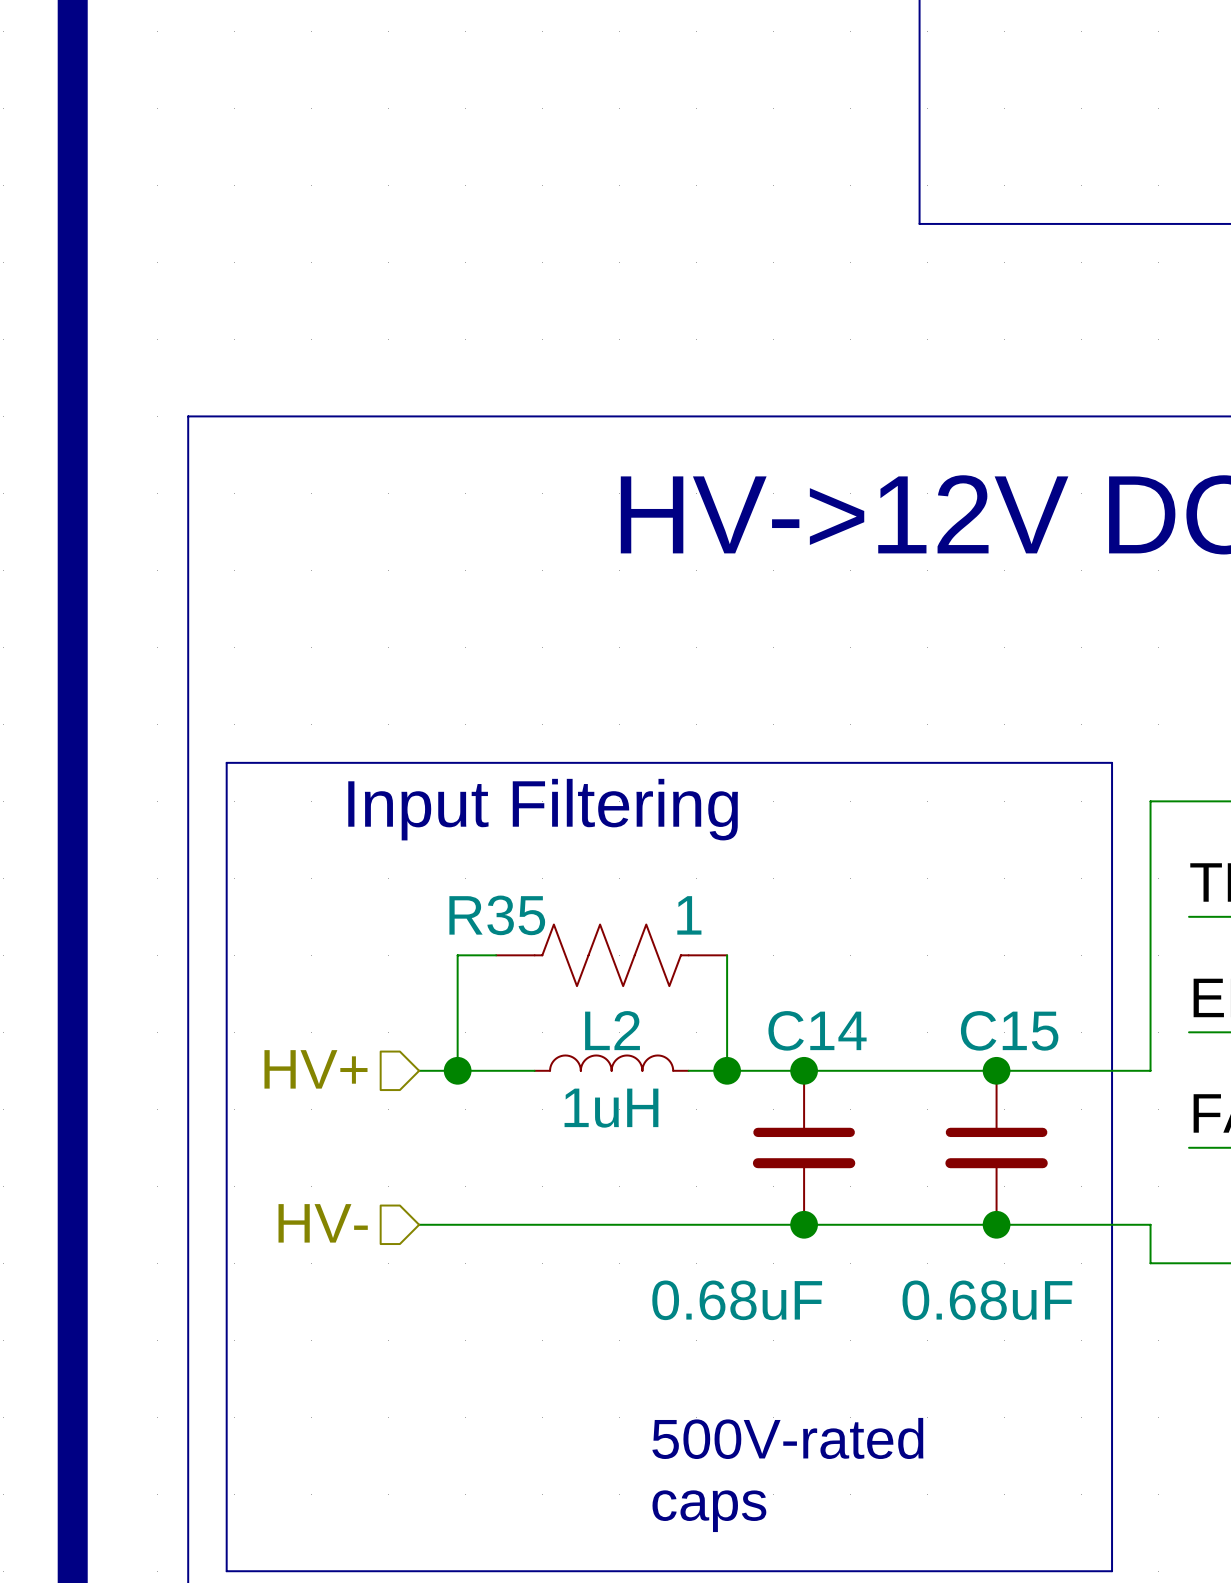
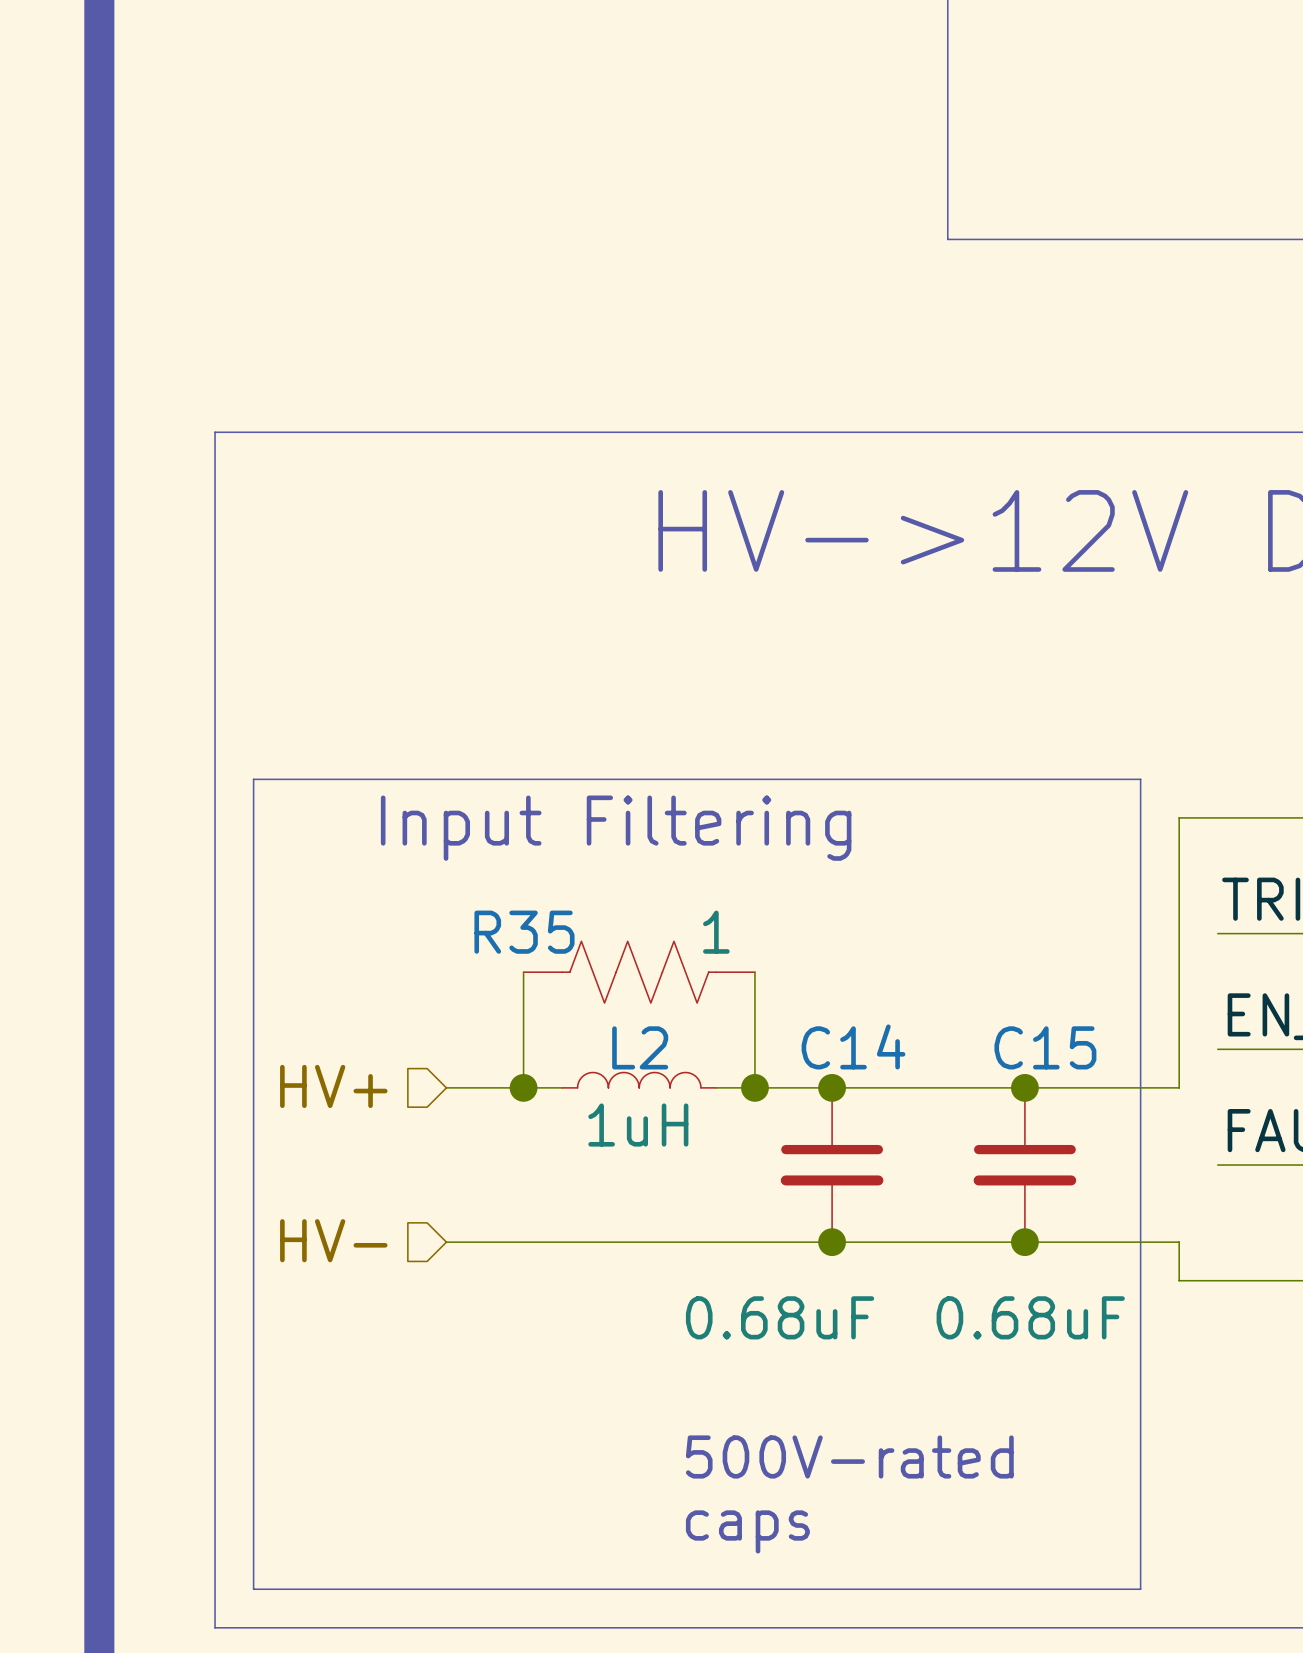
wire: (496, 955) (457, 955) (457, 1070) -> (523, 972) (523, 1087)
junction position: (457, 1070) -> (523, 1087)

